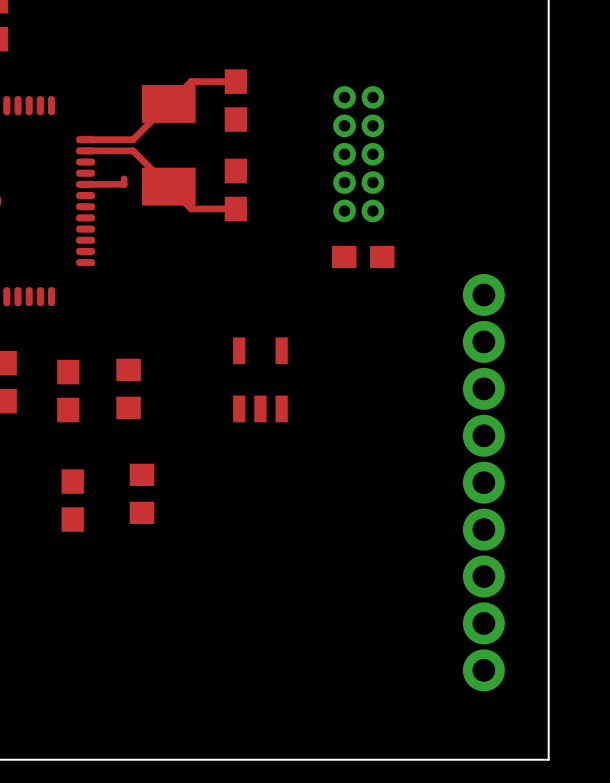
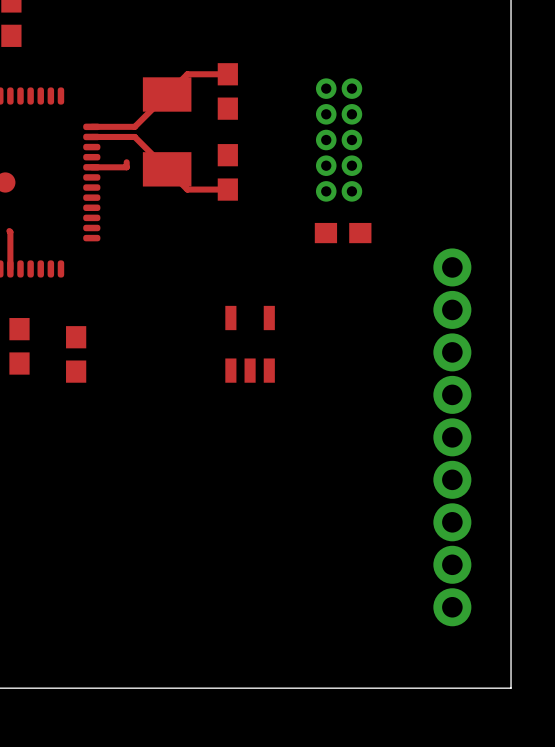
part: (128, 388) -> none
part: (142, 493) -> none
part: (72, 500) -> none

